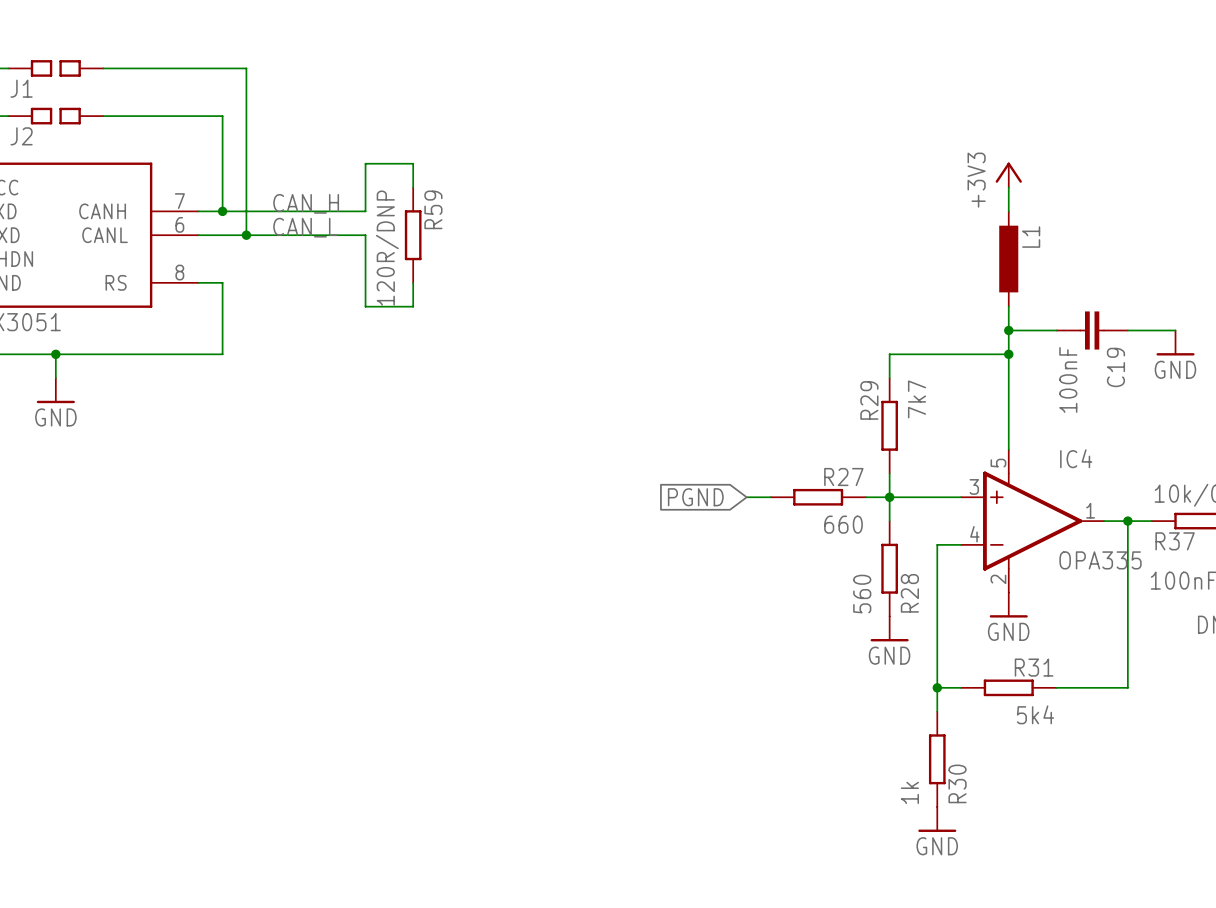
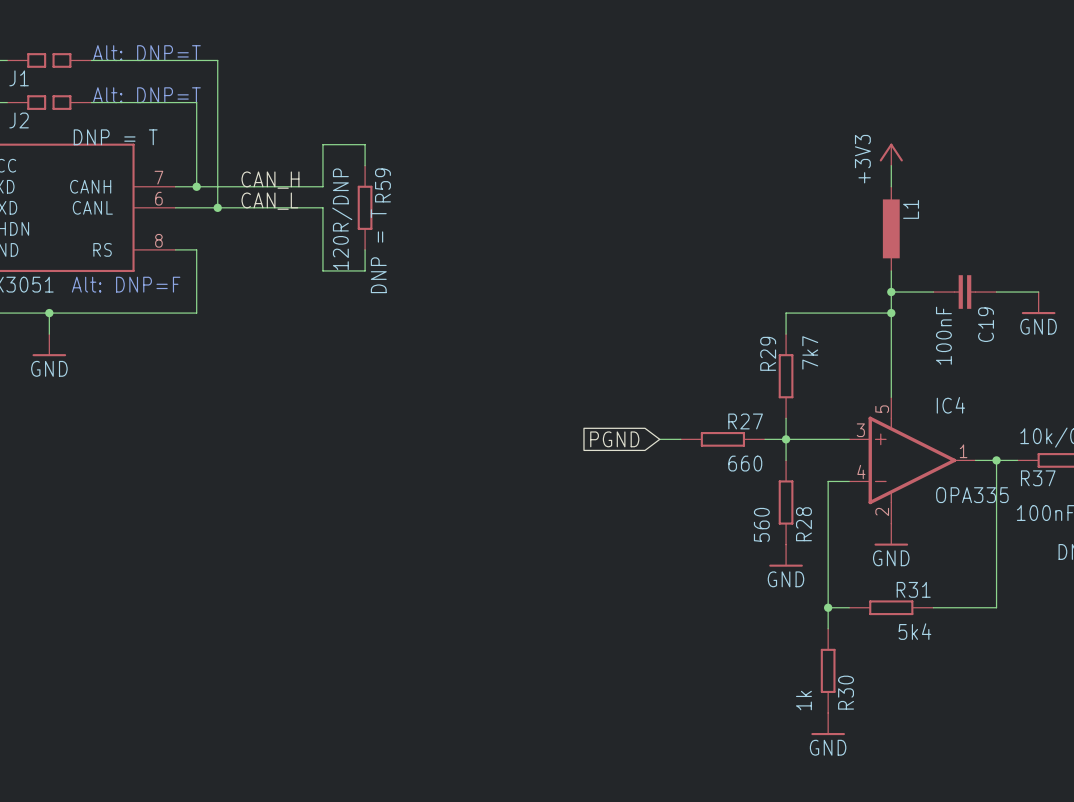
text: none -> Alt: DNP=T (146, 53)
text: none -> Alt: DNP=T (146, 95)
part text: none -> DNP = T (115, 137)
R59 text: none -> DNP = T (378, 251)
text: none -> Alt: DNP=F (126, 284)

